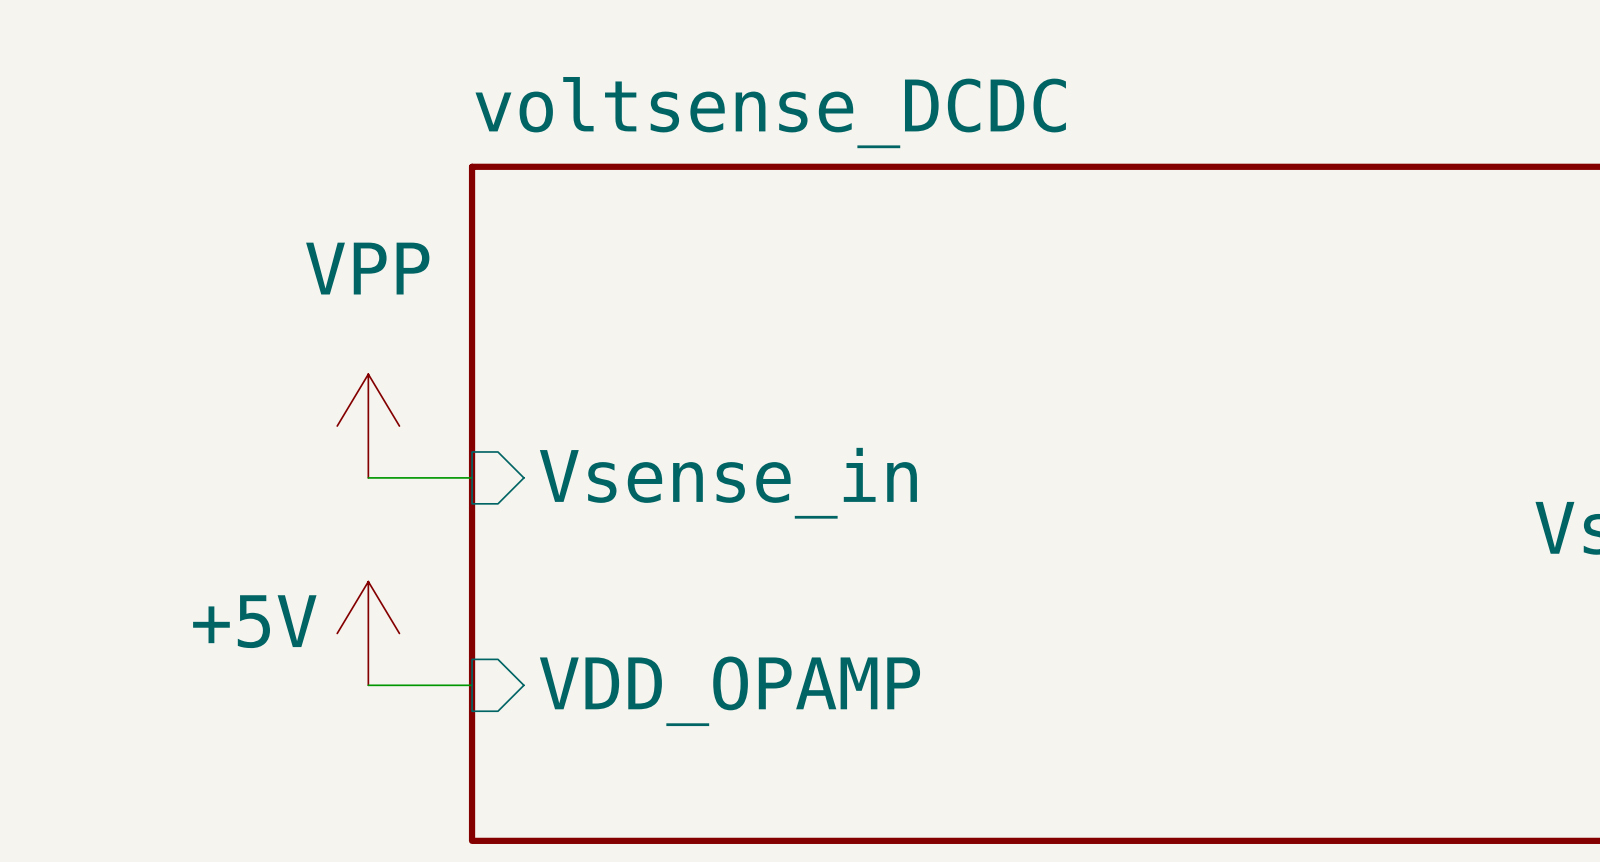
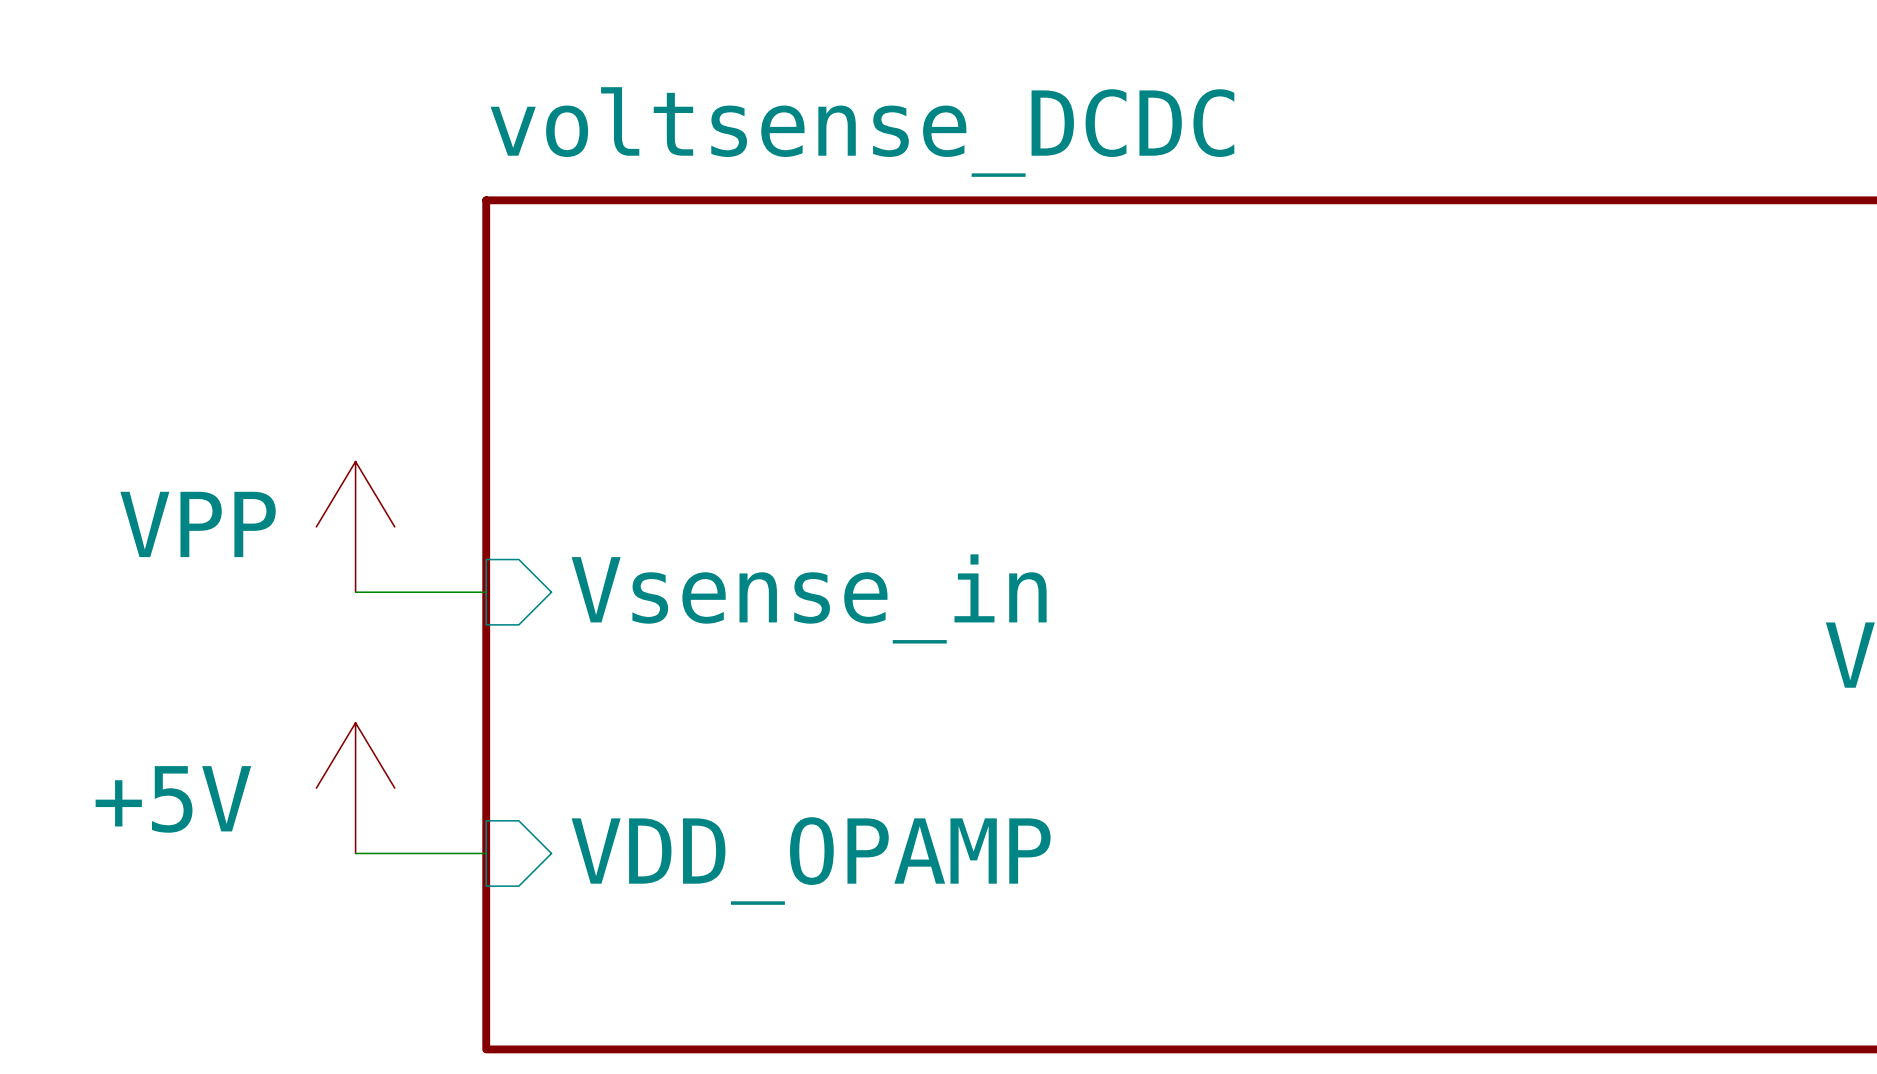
power symbol text position: VPP (367, 268) -> VPP (198, 524)
power symbol text position: +5V (254, 621) -> +5V (173, 799)

